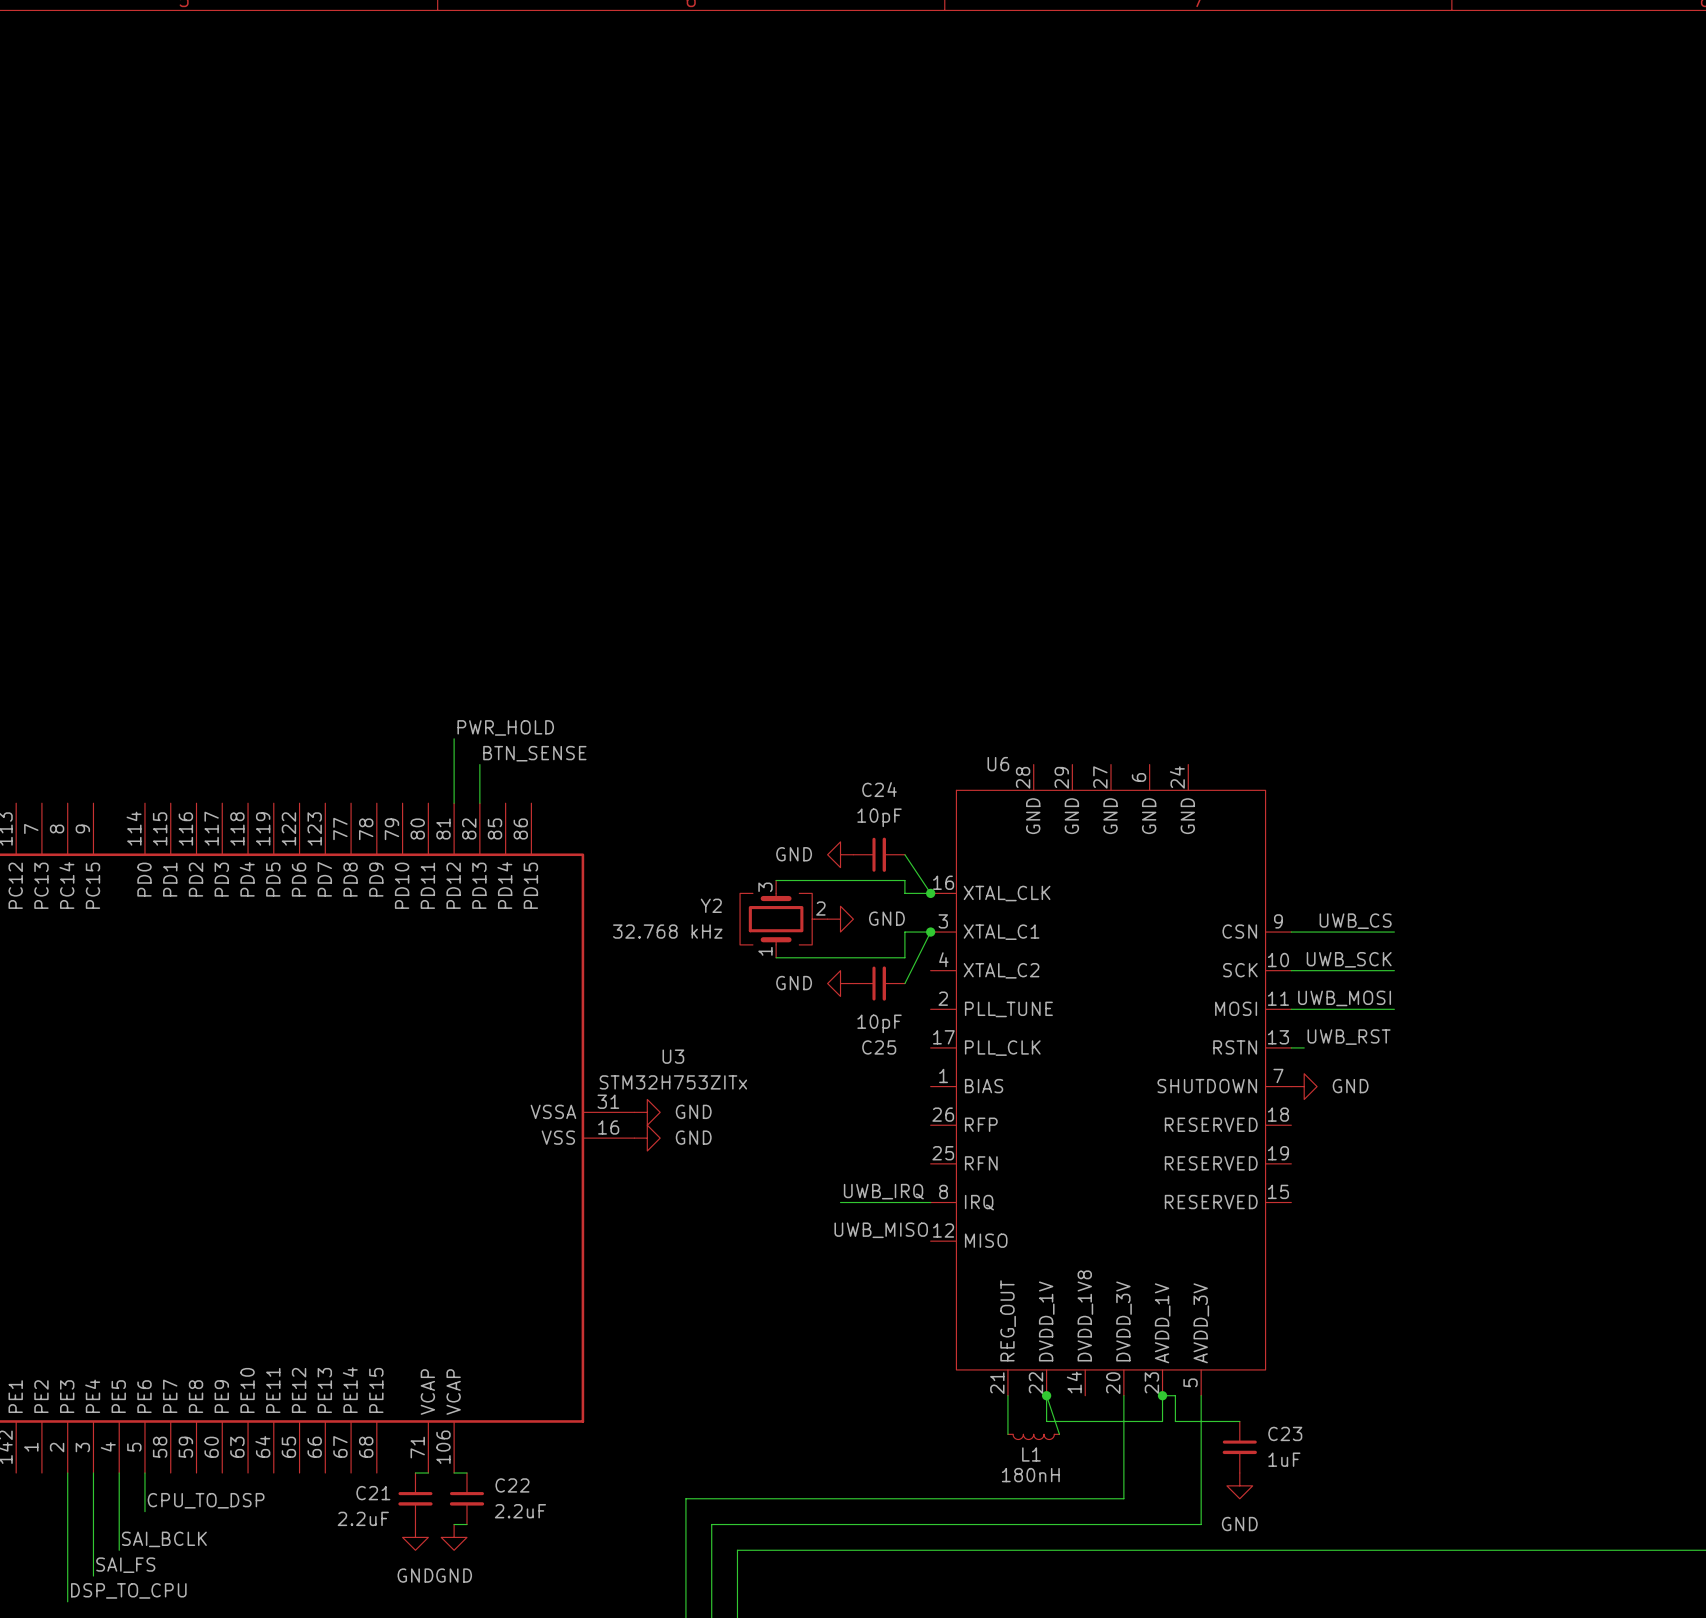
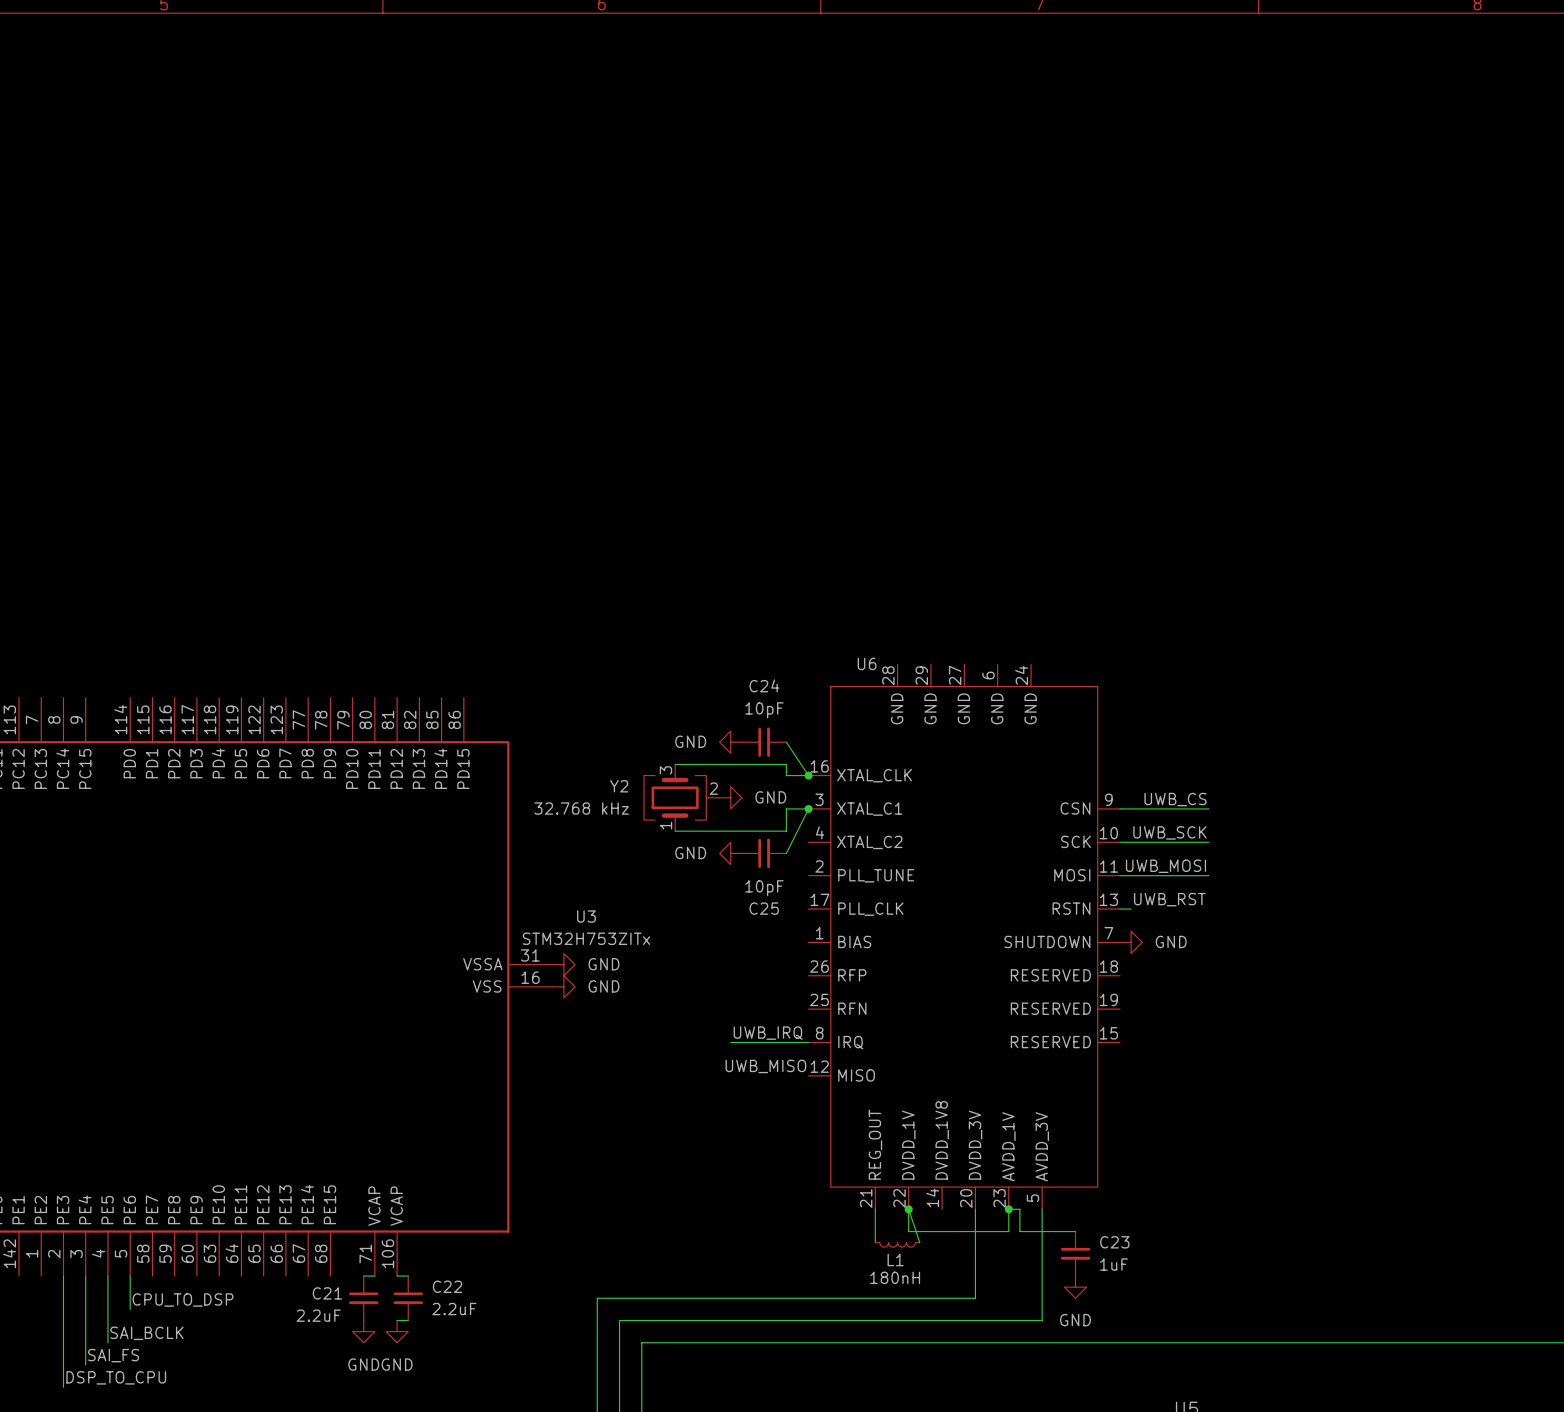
label: PWR_HOLD (505, 727) -> none
wire: (454, 738) (454, 803) -> none
label: BTN_SENSE (534, 753) -> none
wire: (479, 764) (479, 803) -> none

